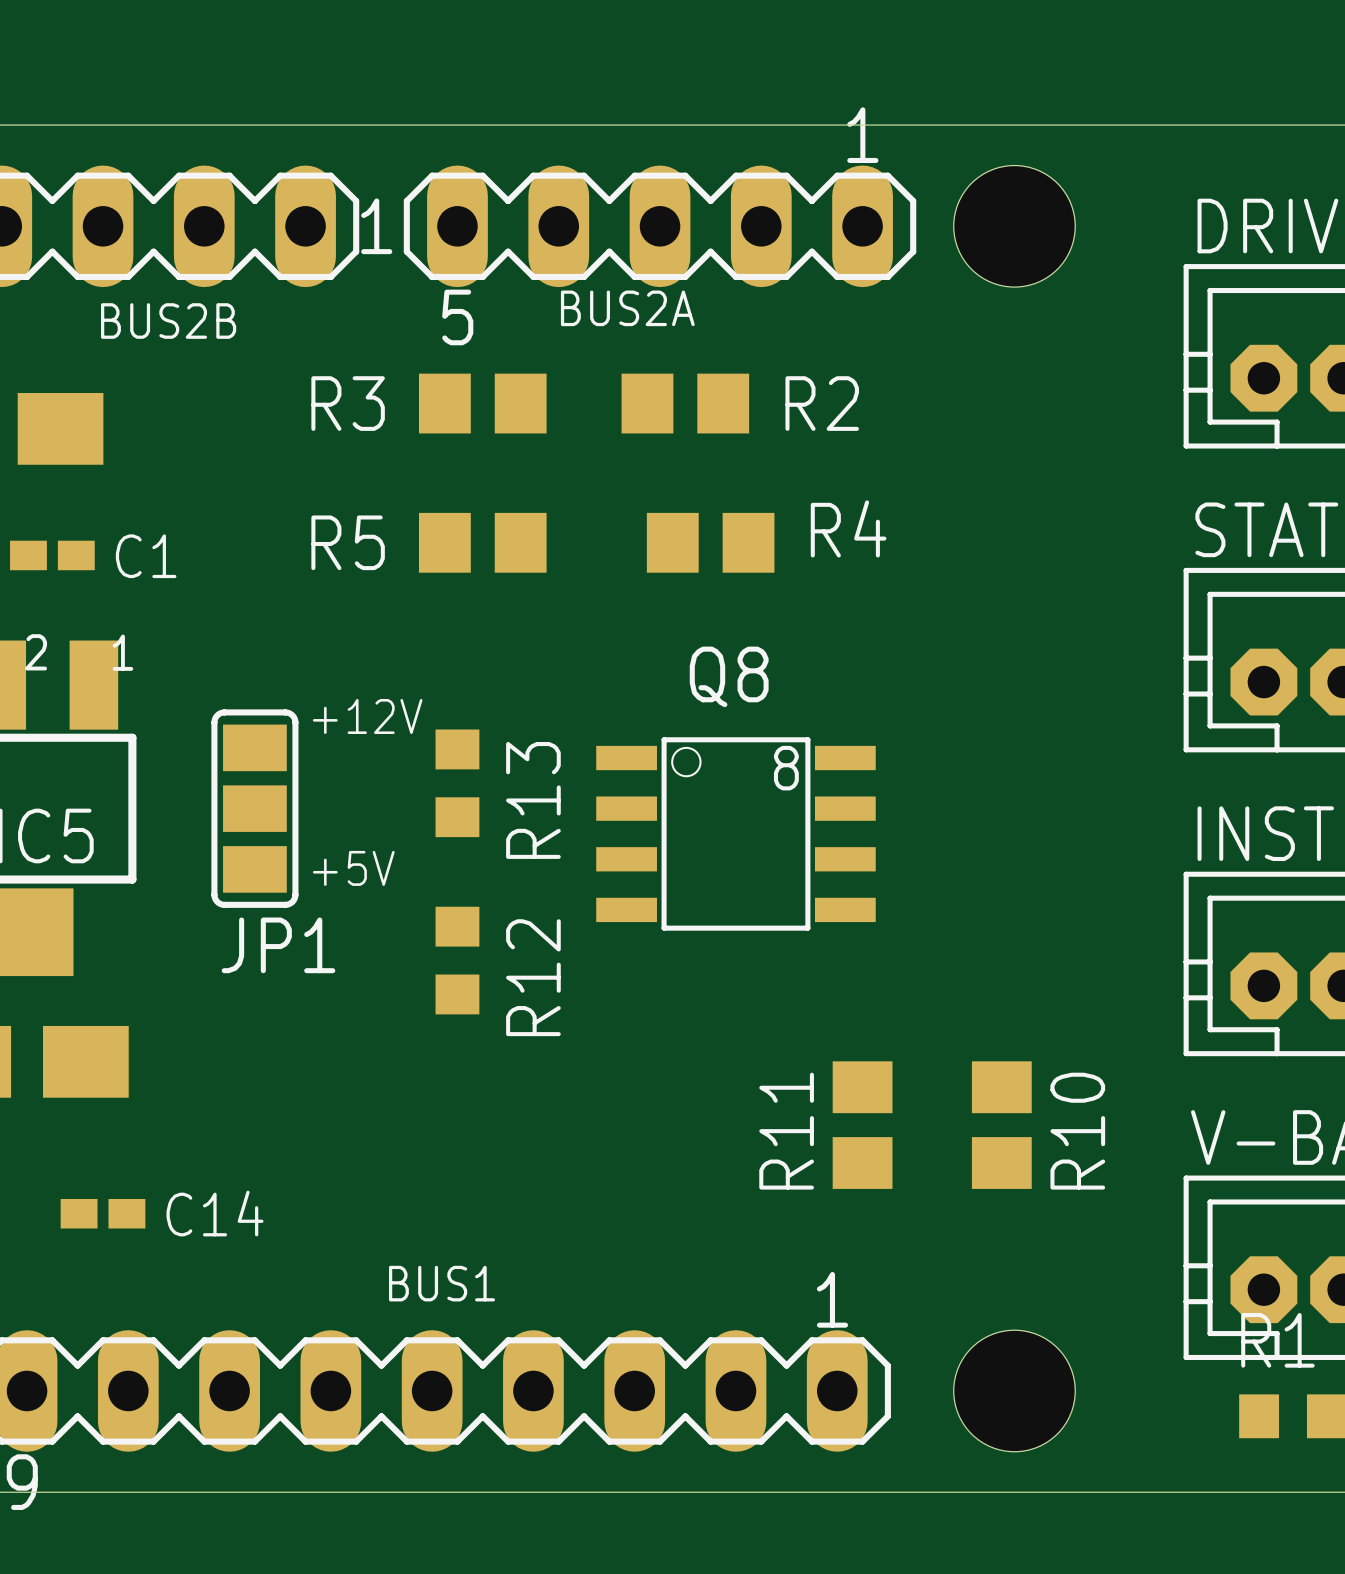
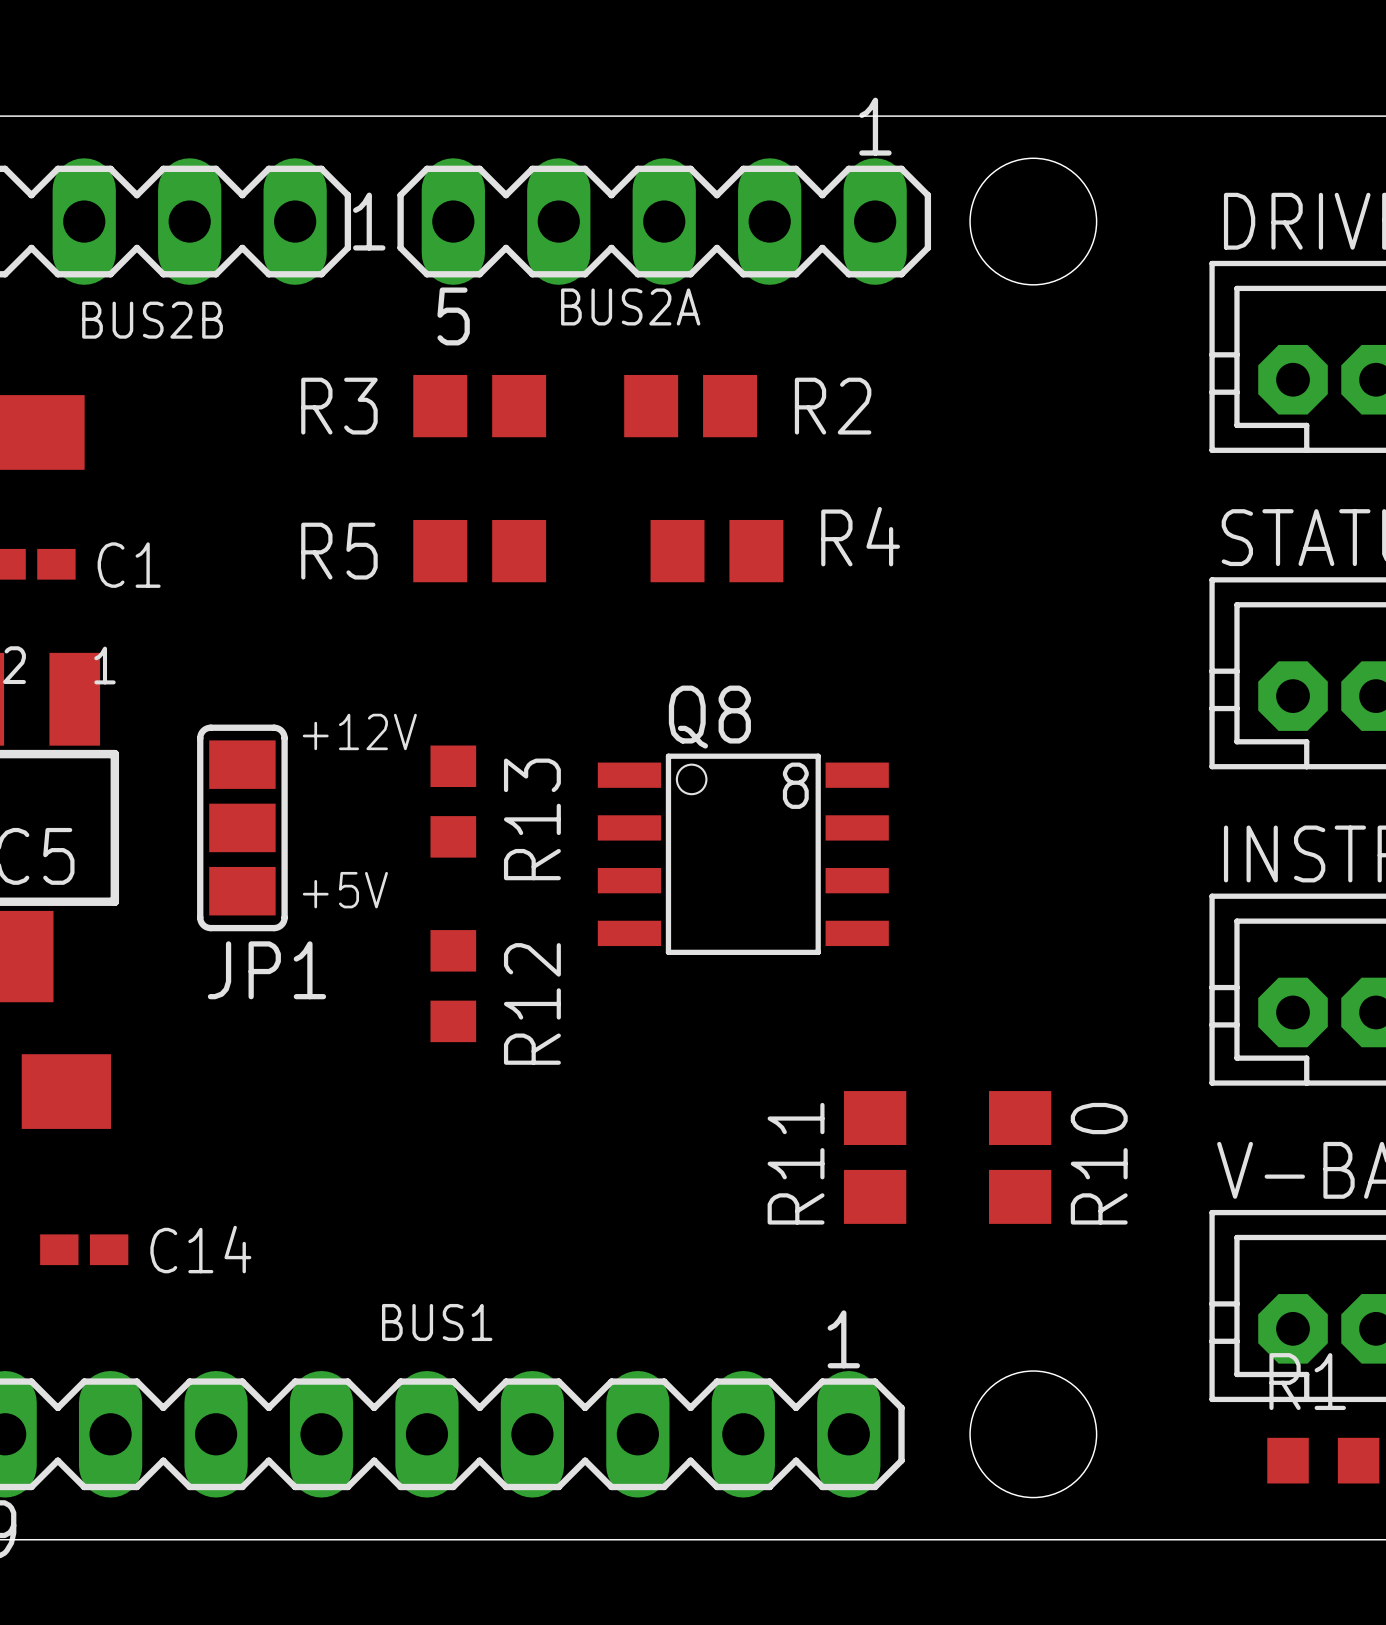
Q8 name position: Q8 (729, 676) -> Q8 (709, 717)

